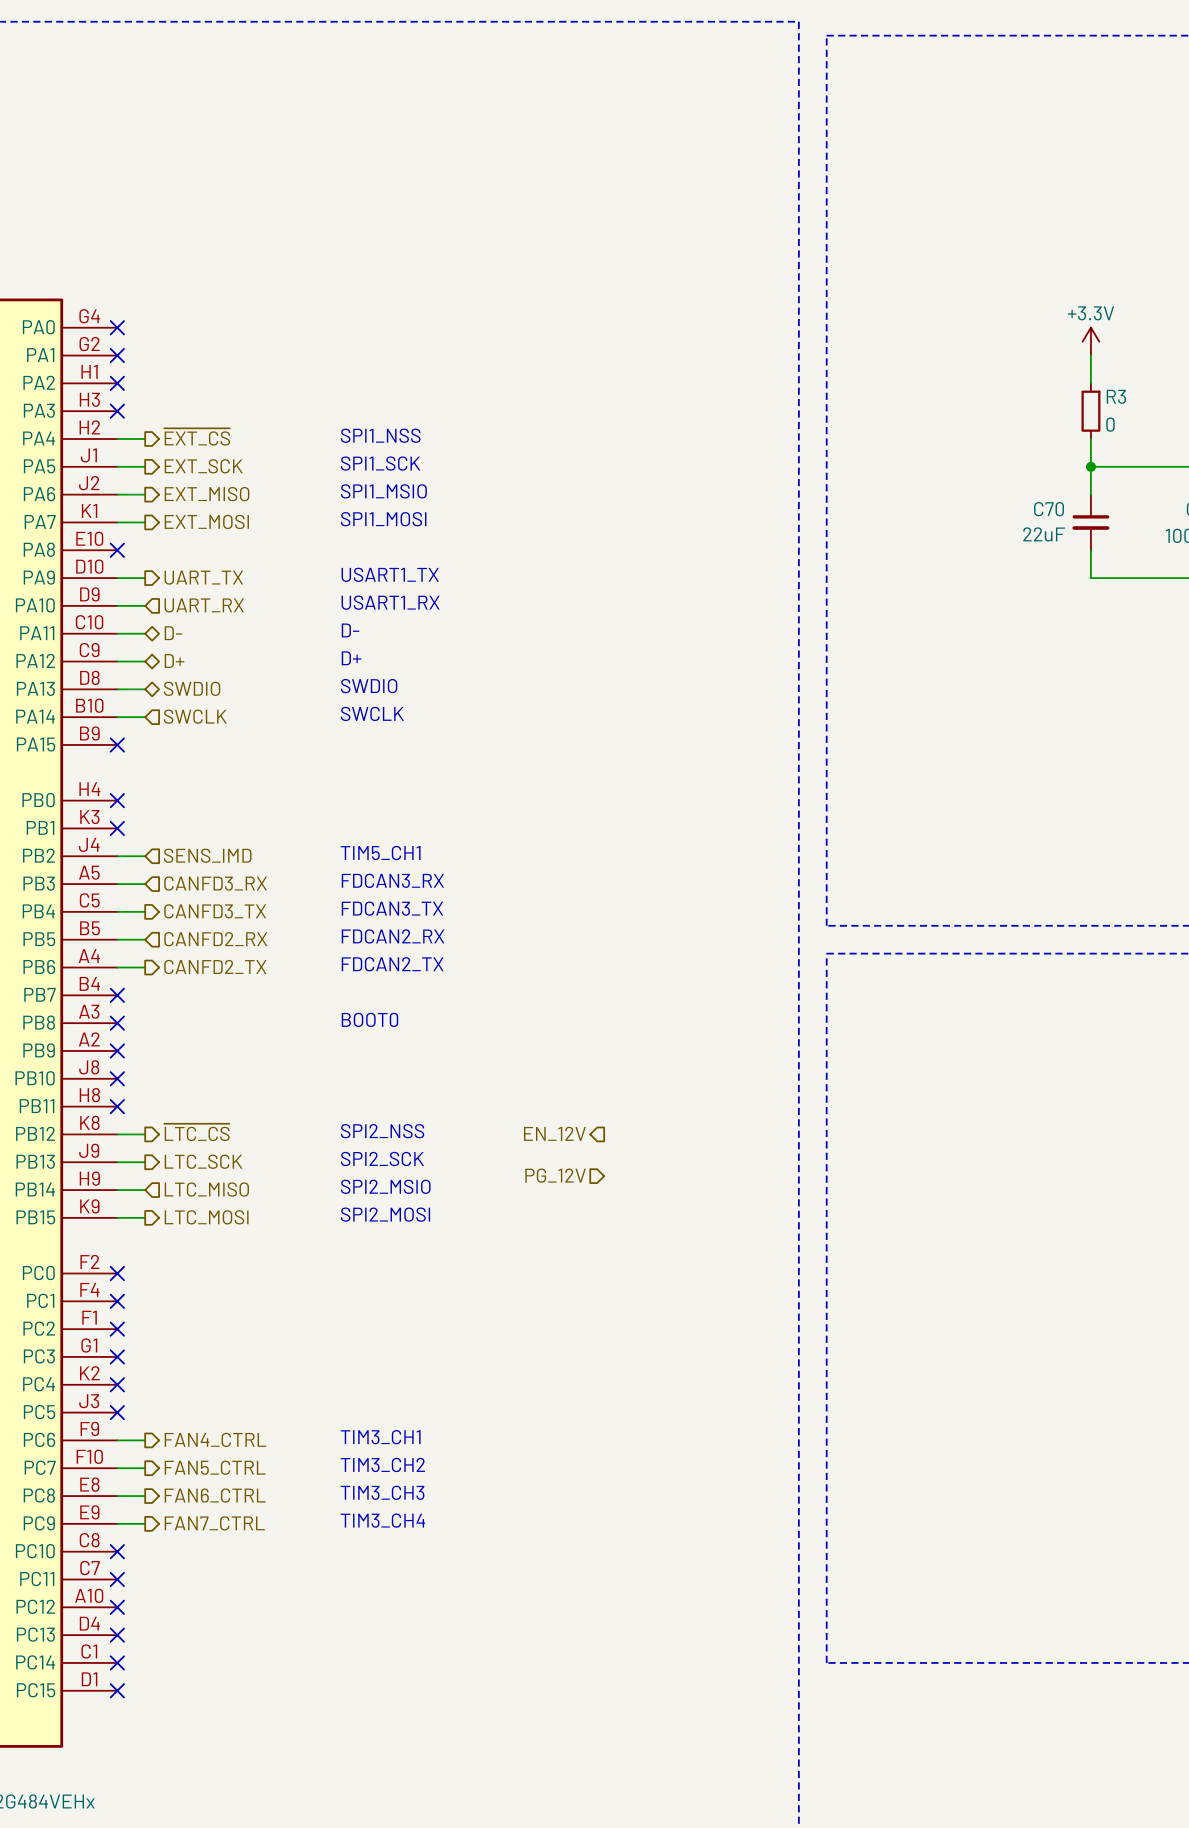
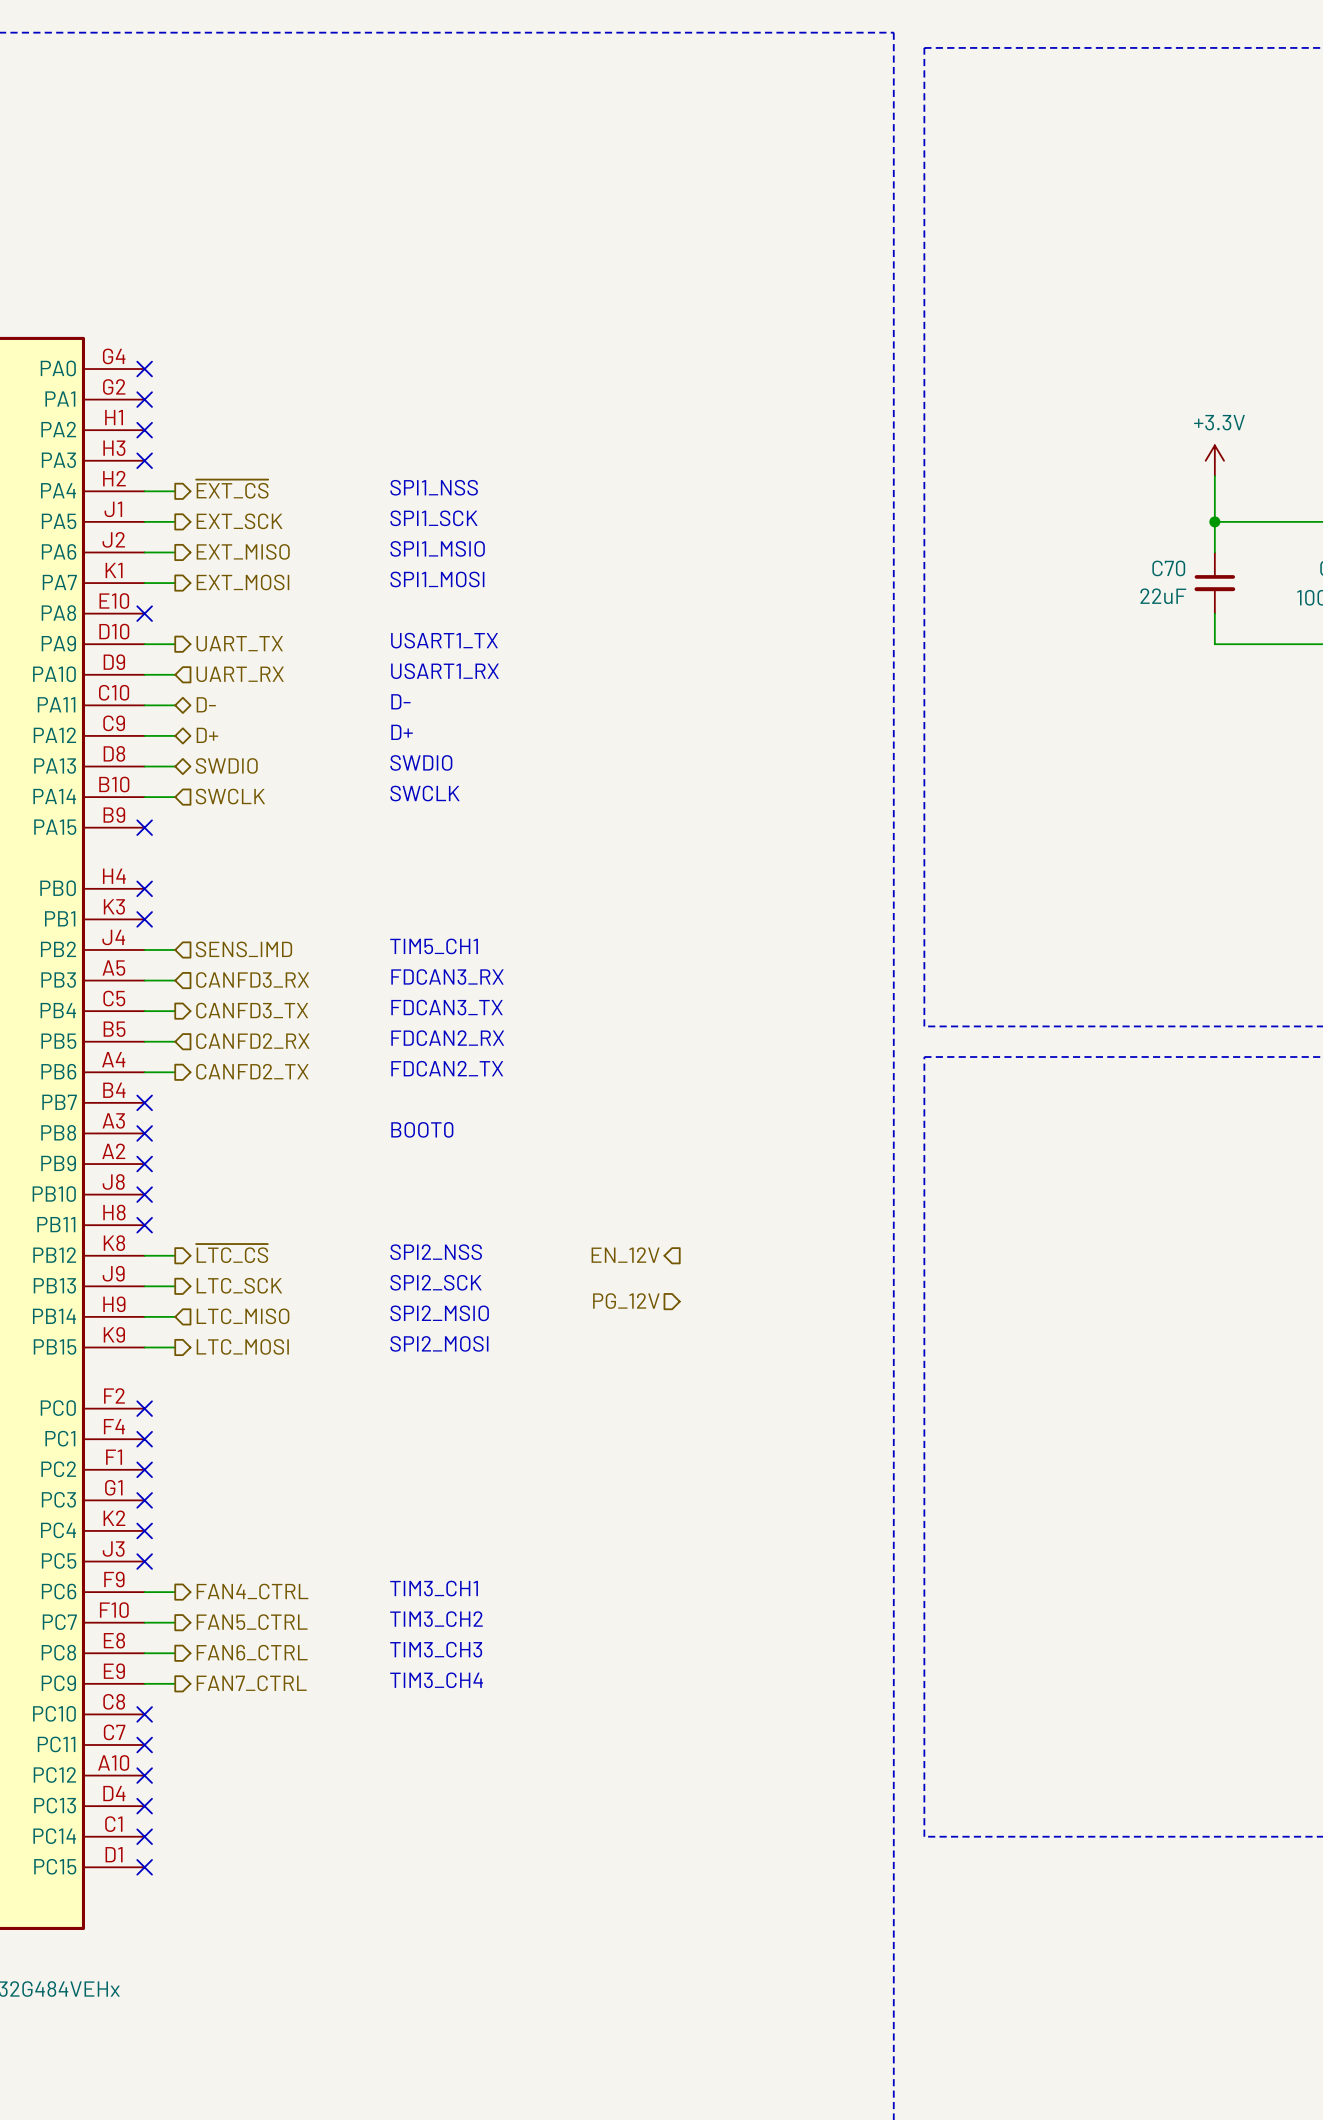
power symbol text position: +3.3V (1091, 313) -> +3.3V (1219, 422)
power symbol position: +3.3V (1090, 341) -> +3.3V (1214, 460)
wire: (1090, 355) (1090, 383) -> none
R3: 0 (1090, 411) -> none

